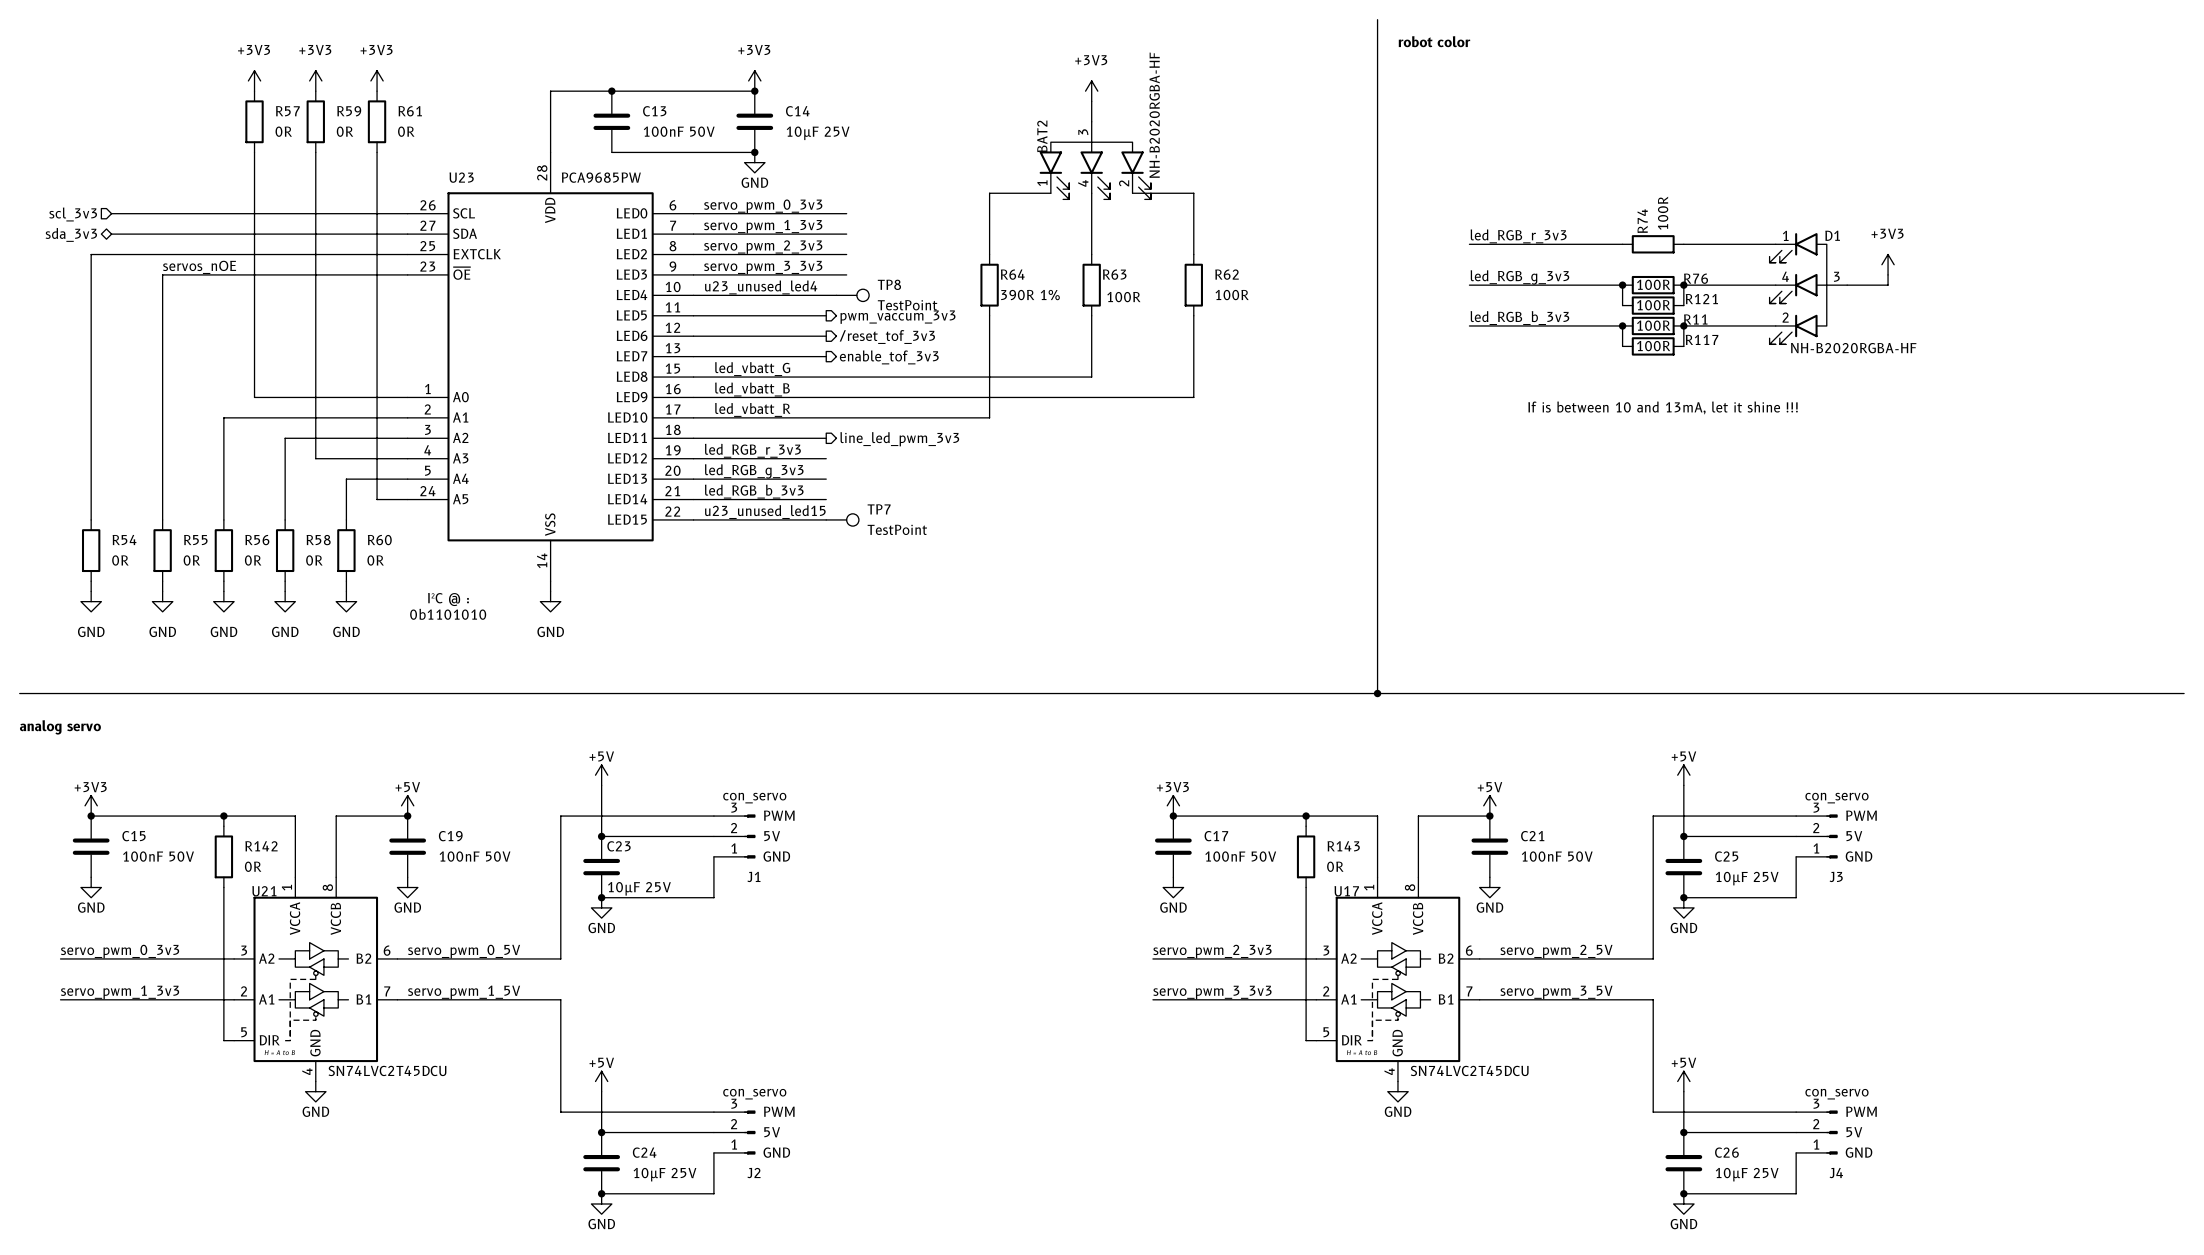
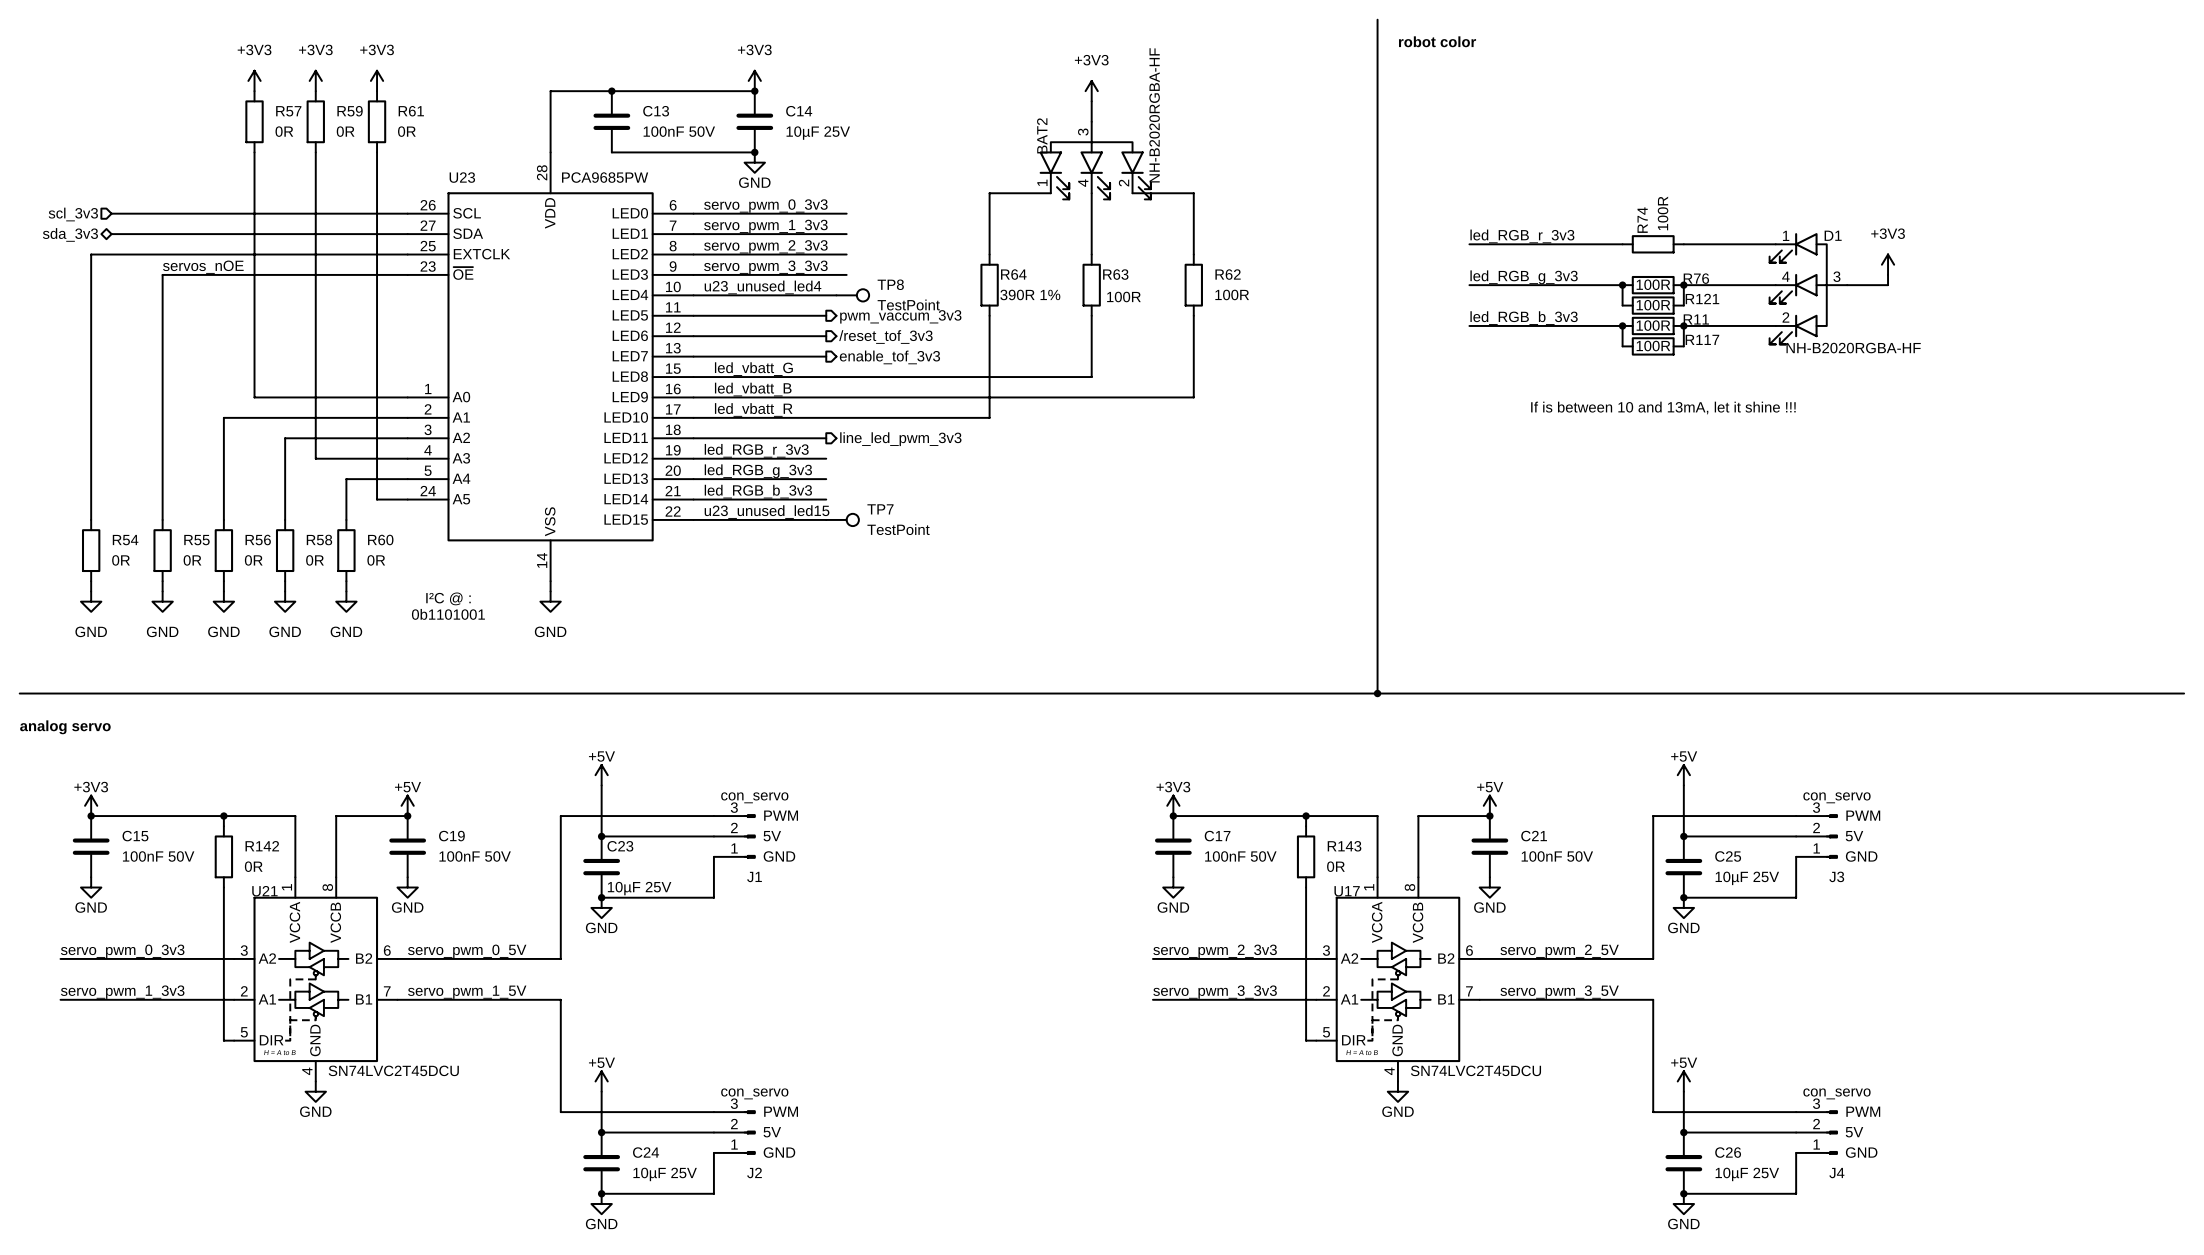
text: 0b1101010 (448, 614) -> 0b1101001 (448, 614)

